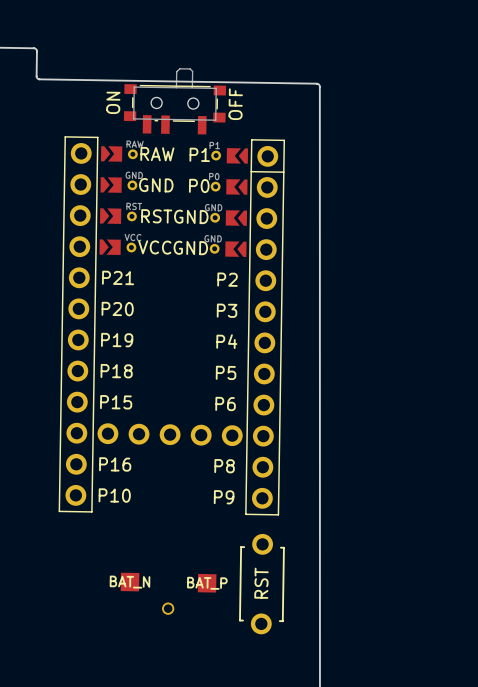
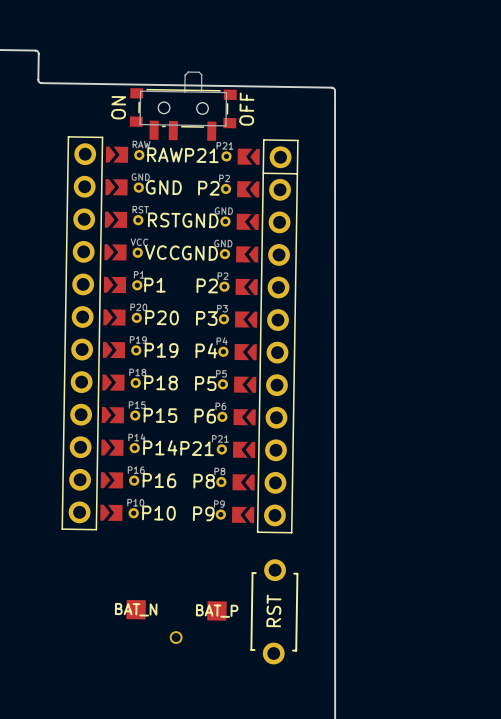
part footprint: [58, 136, 286, 516] -> [61, 136, 299, 534]

